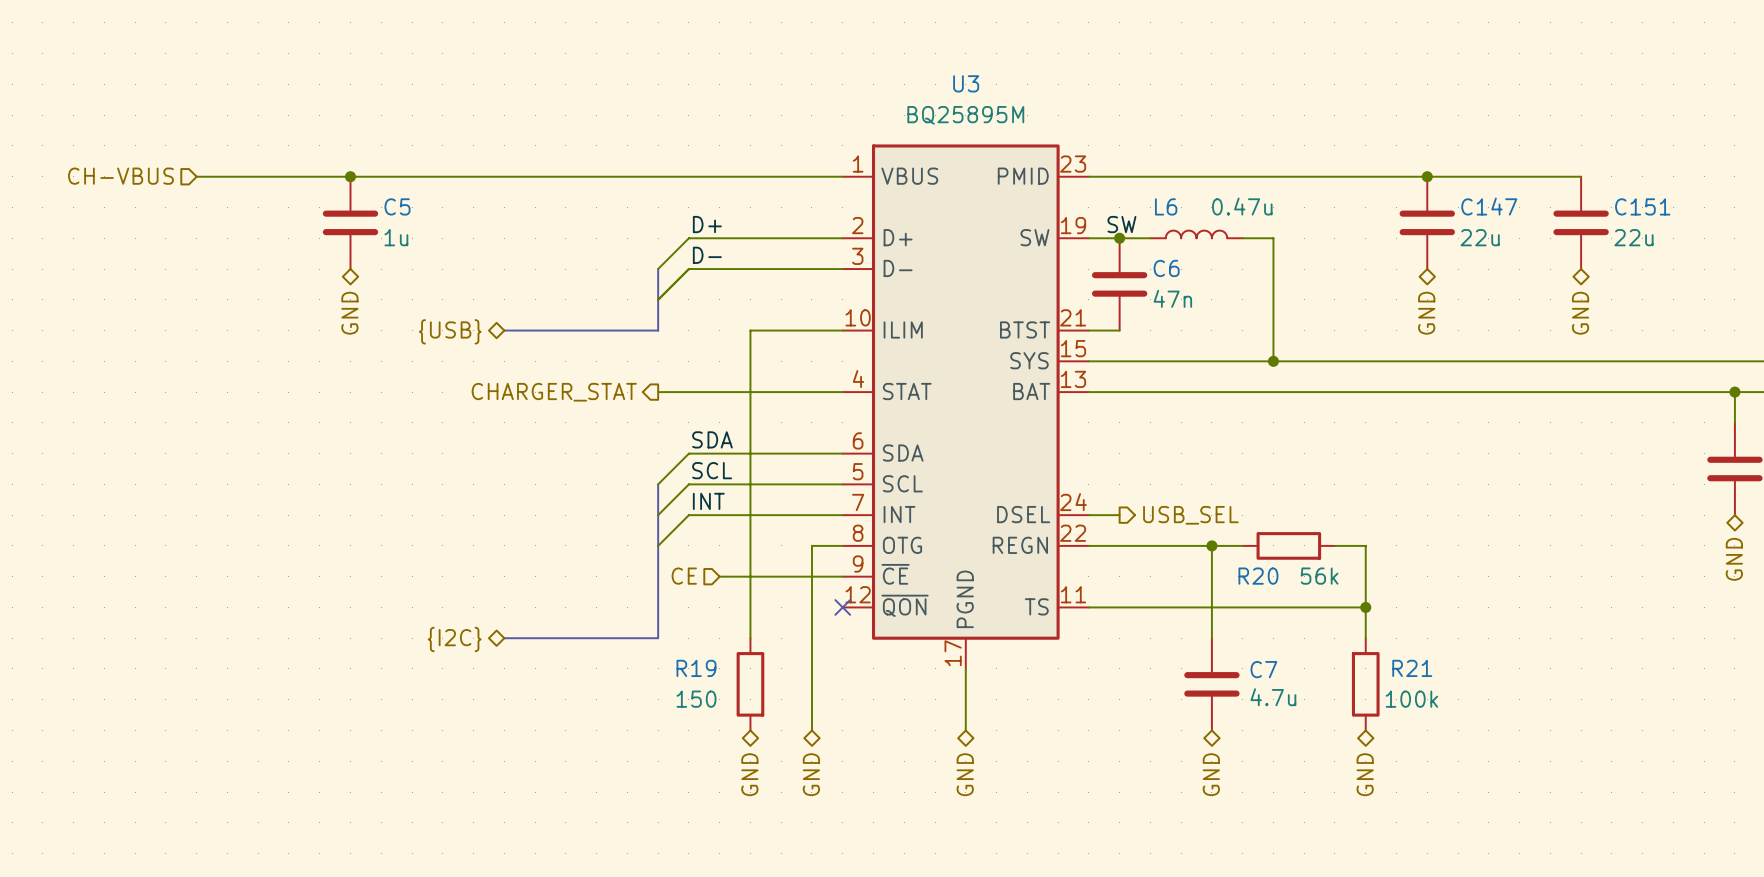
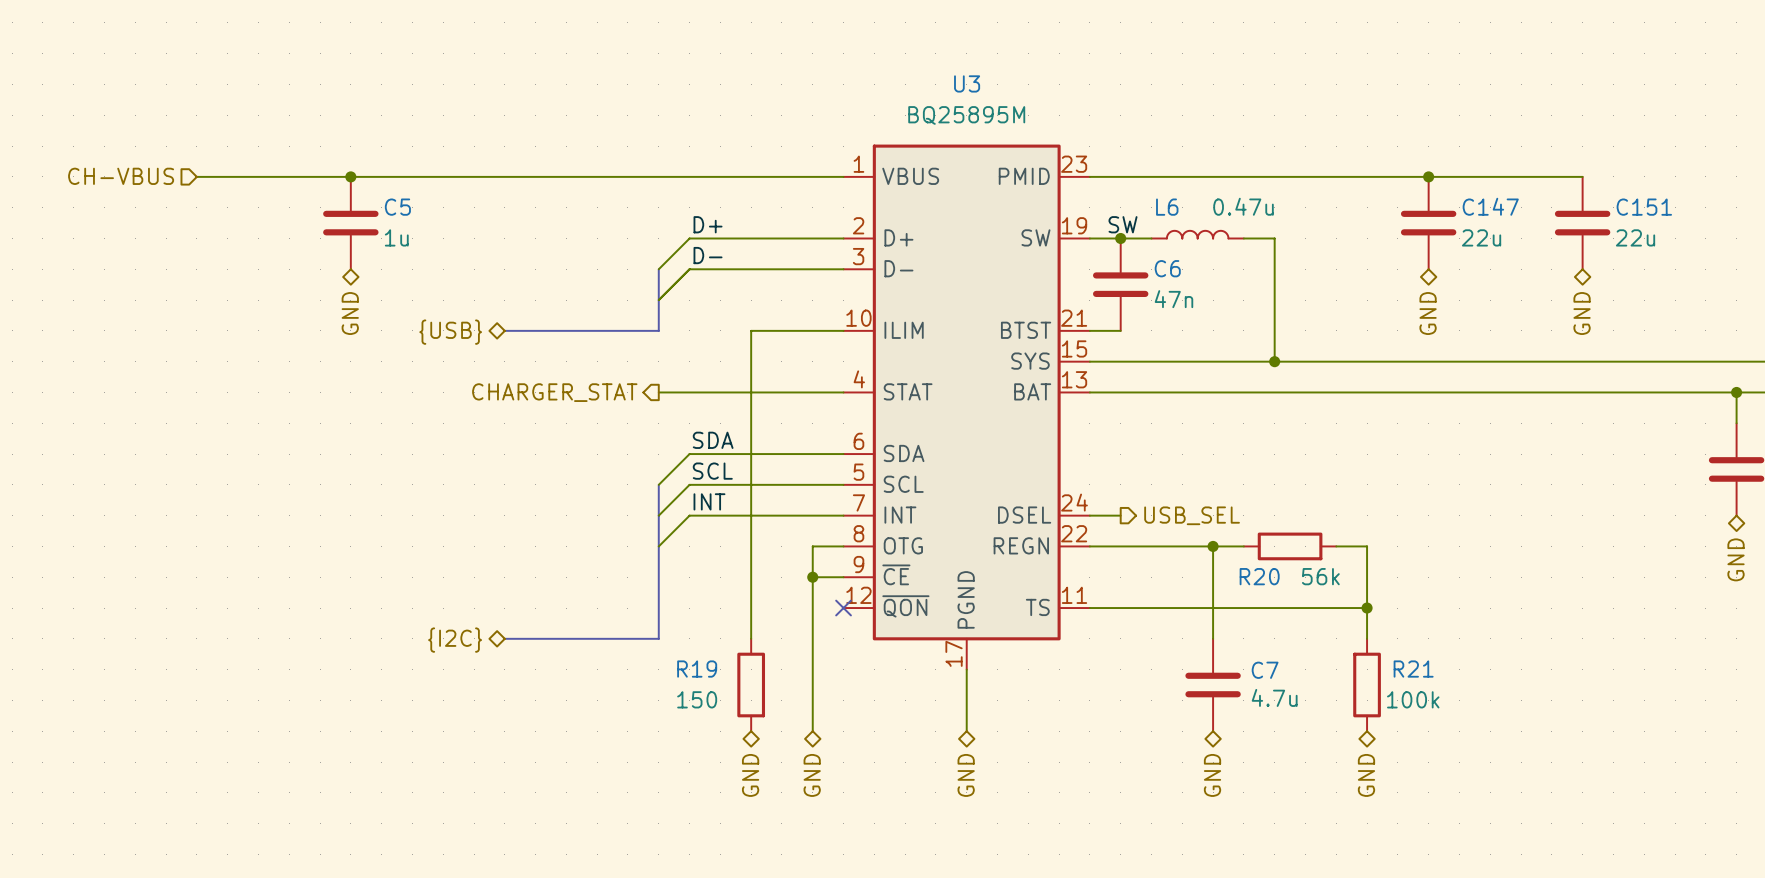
hierarchical label: CE (684, 576) -> none
wire: (719, 576) (811, 576) -> none
junction: none -> (812, 577)

